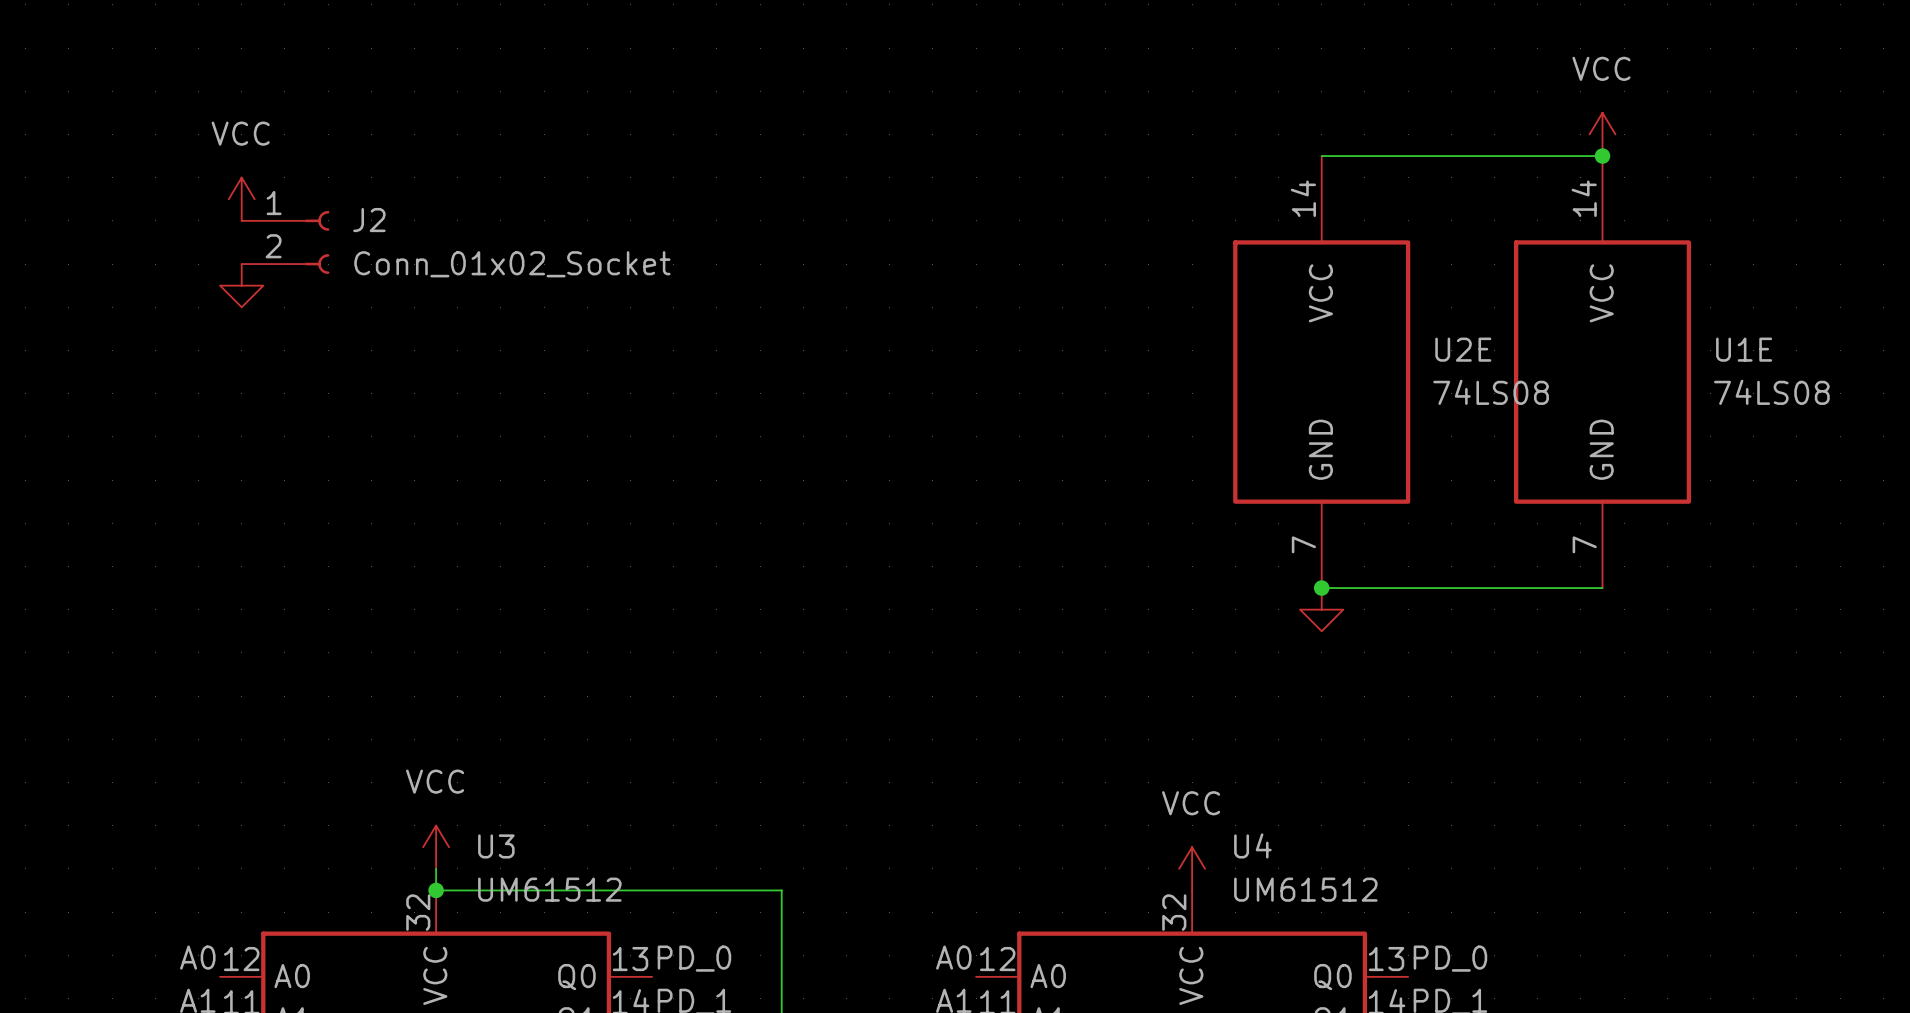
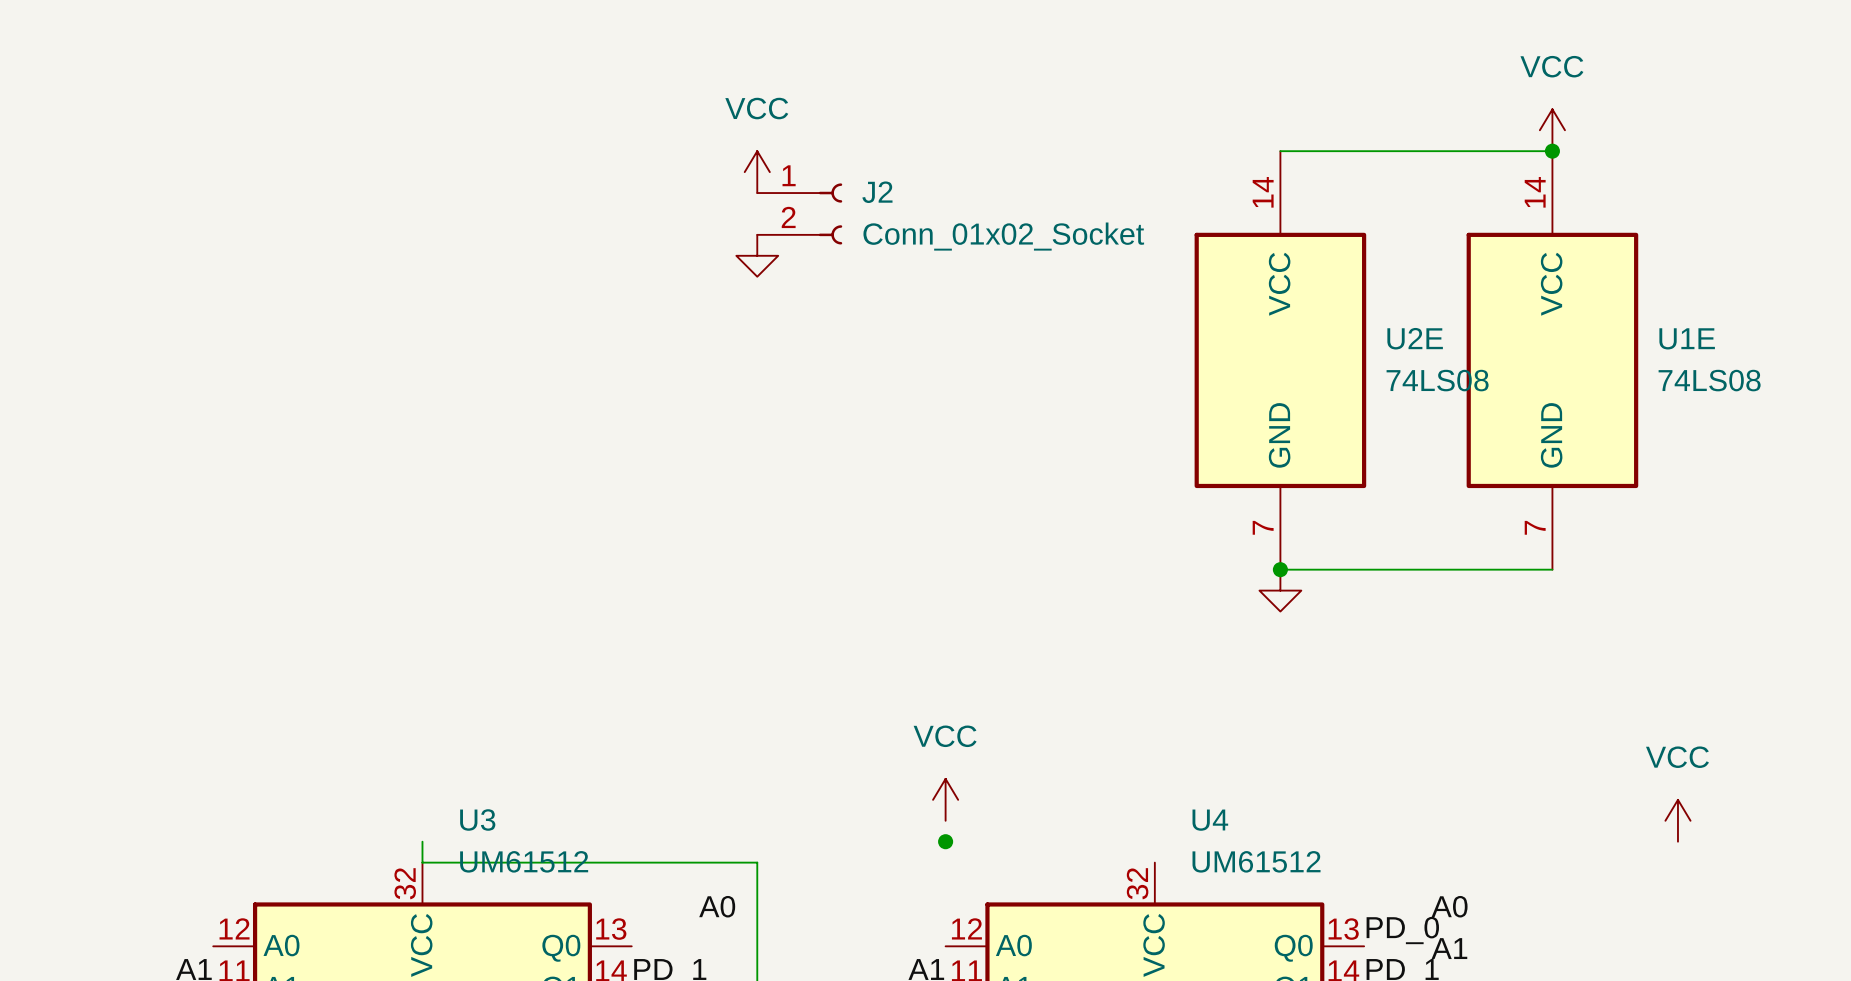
power symbol: none -> VCC (757, 172)
power symbol: VCC (241, 199) -> none
J2 position: (285, 242) -> (799, 213)
power symbol: none -> (757, 255)
power symbol: (241, 285) -> none
power symbol: VCC (436, 847) -> none
power symbol: none -> VCC (1677, 820)
junction: none -> (945, 841)
power symbol position: VCC (1192, 868) -> VCC (945, 799)
junction: (436, 890) -> none
label: none -> A0 (1449, 906)
label: A0 (197, 957) -> none
label position: A0 (953, 957) -> A0 (717, 906)
label: PD_0 (694, 958) -> none
label: none -> A1 (1449, 948)

